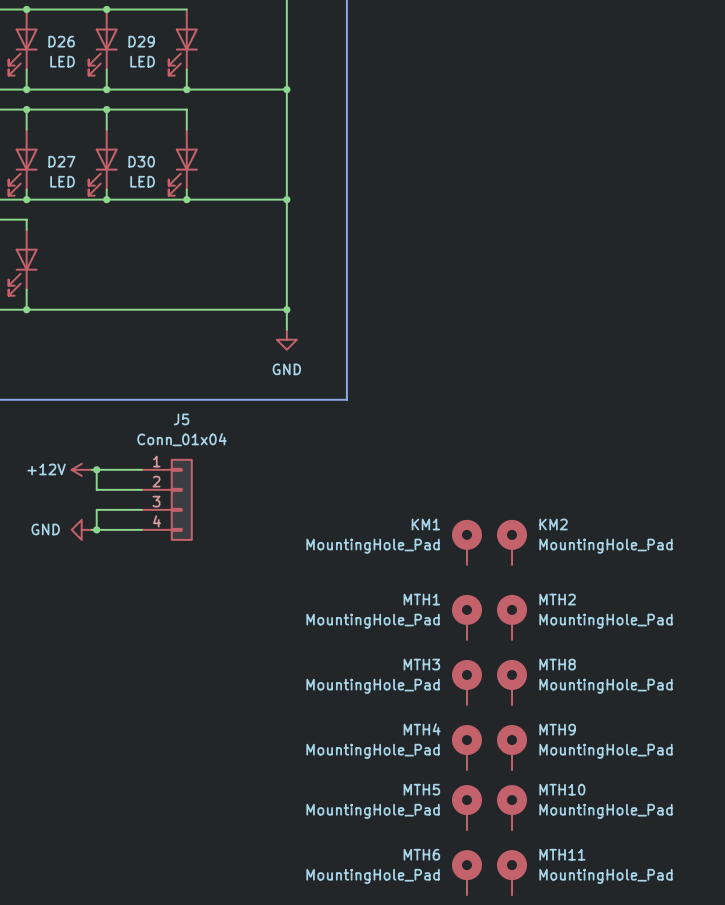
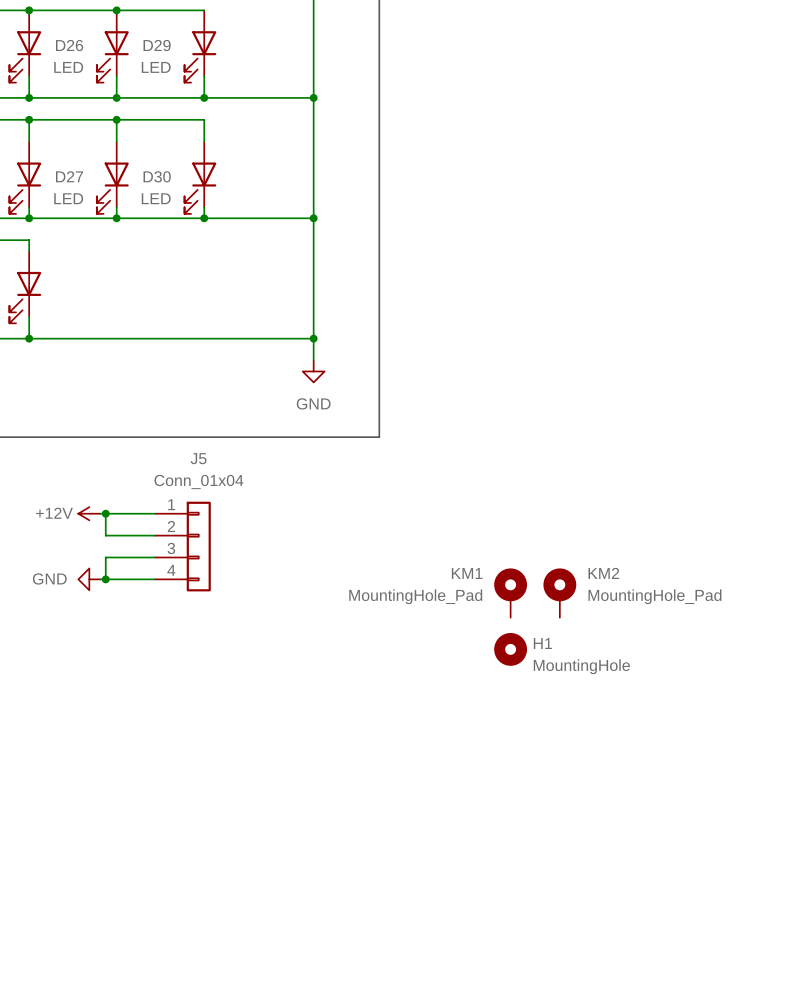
H1: none -> MountingHole (510, 649)
MTH1: MountingHole_Pad (466, 617) -> none
MTH2: MountingHole_Pad (512, 617) -> none
MTH3: MountingHole_Pad (466, 682) -> none
MTH8: MountingHole_Pad (512, 682) -> none
MTH4: MountingHole_Pad (466, 747) -> none
MTH9: MountingHole_Pad (512, 747) -> none
MTH5: MountingHole_Pad (466, 807) -> none
MTH10: MountingHole_Pad (512, 807) -> none
MTH6: MountingHole_Pad (466, 872) -> none
MTH11: MountingHole_Pad (512, 872) -> none

